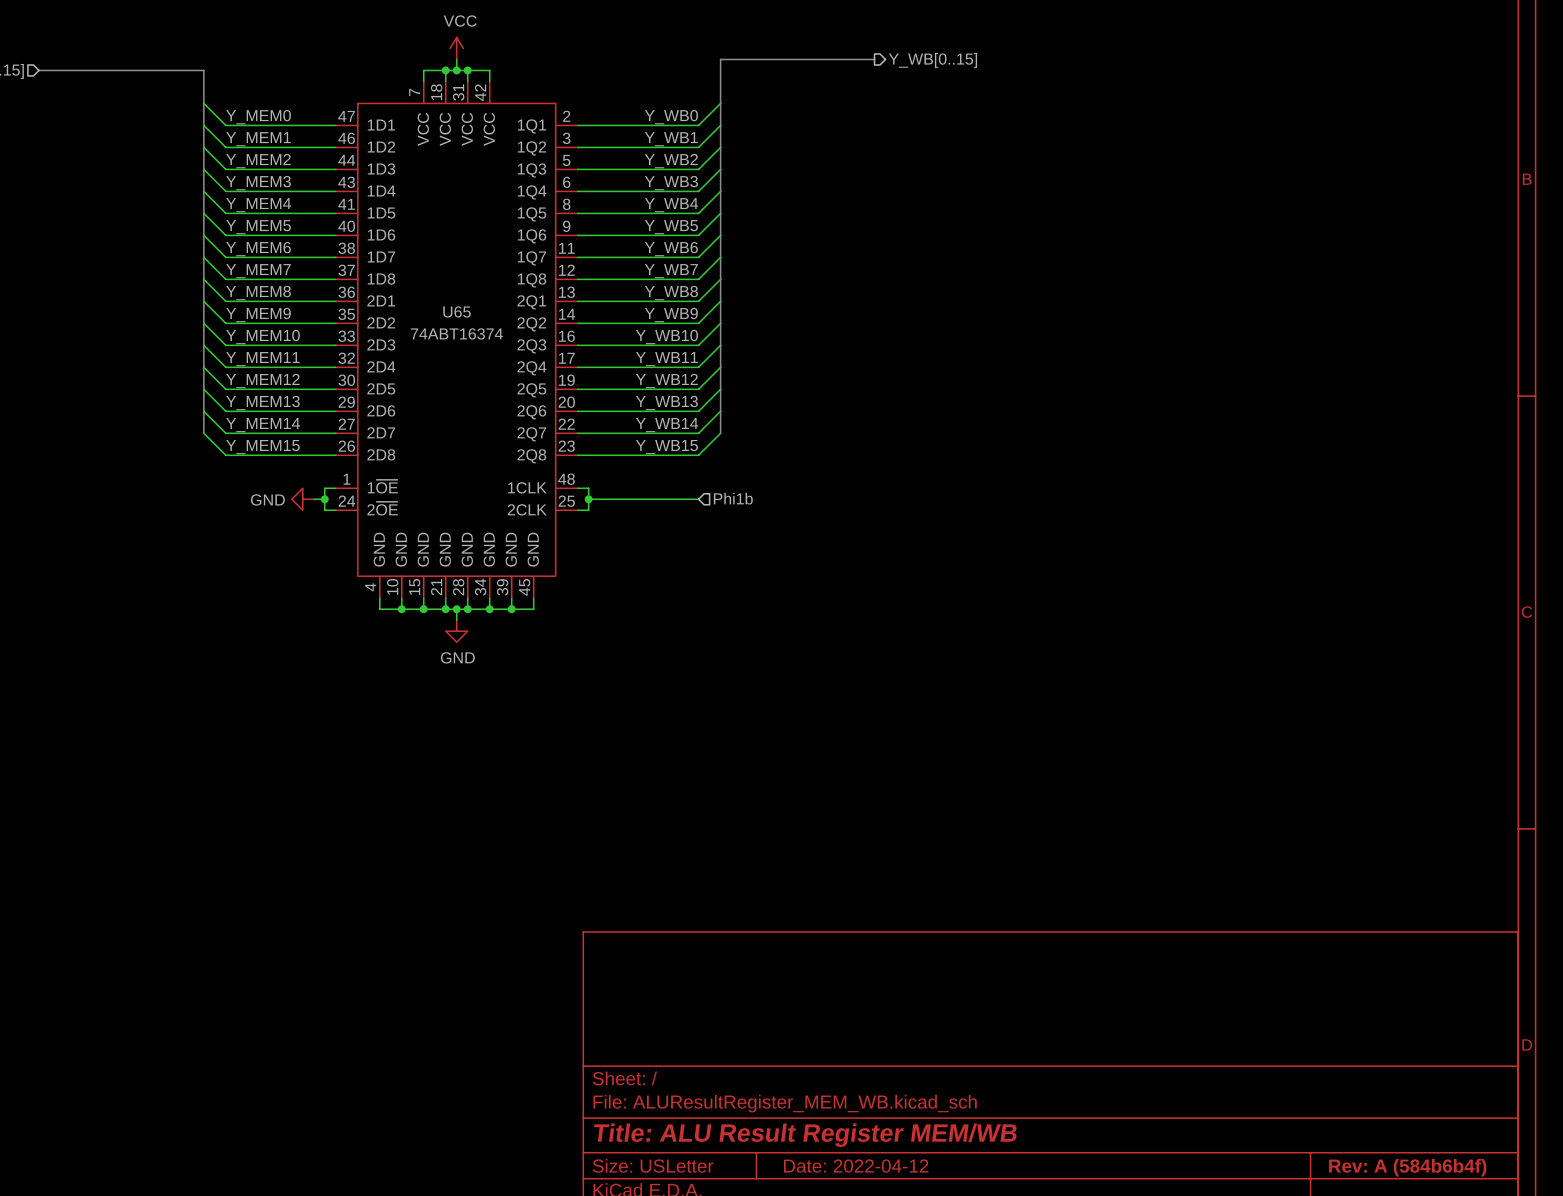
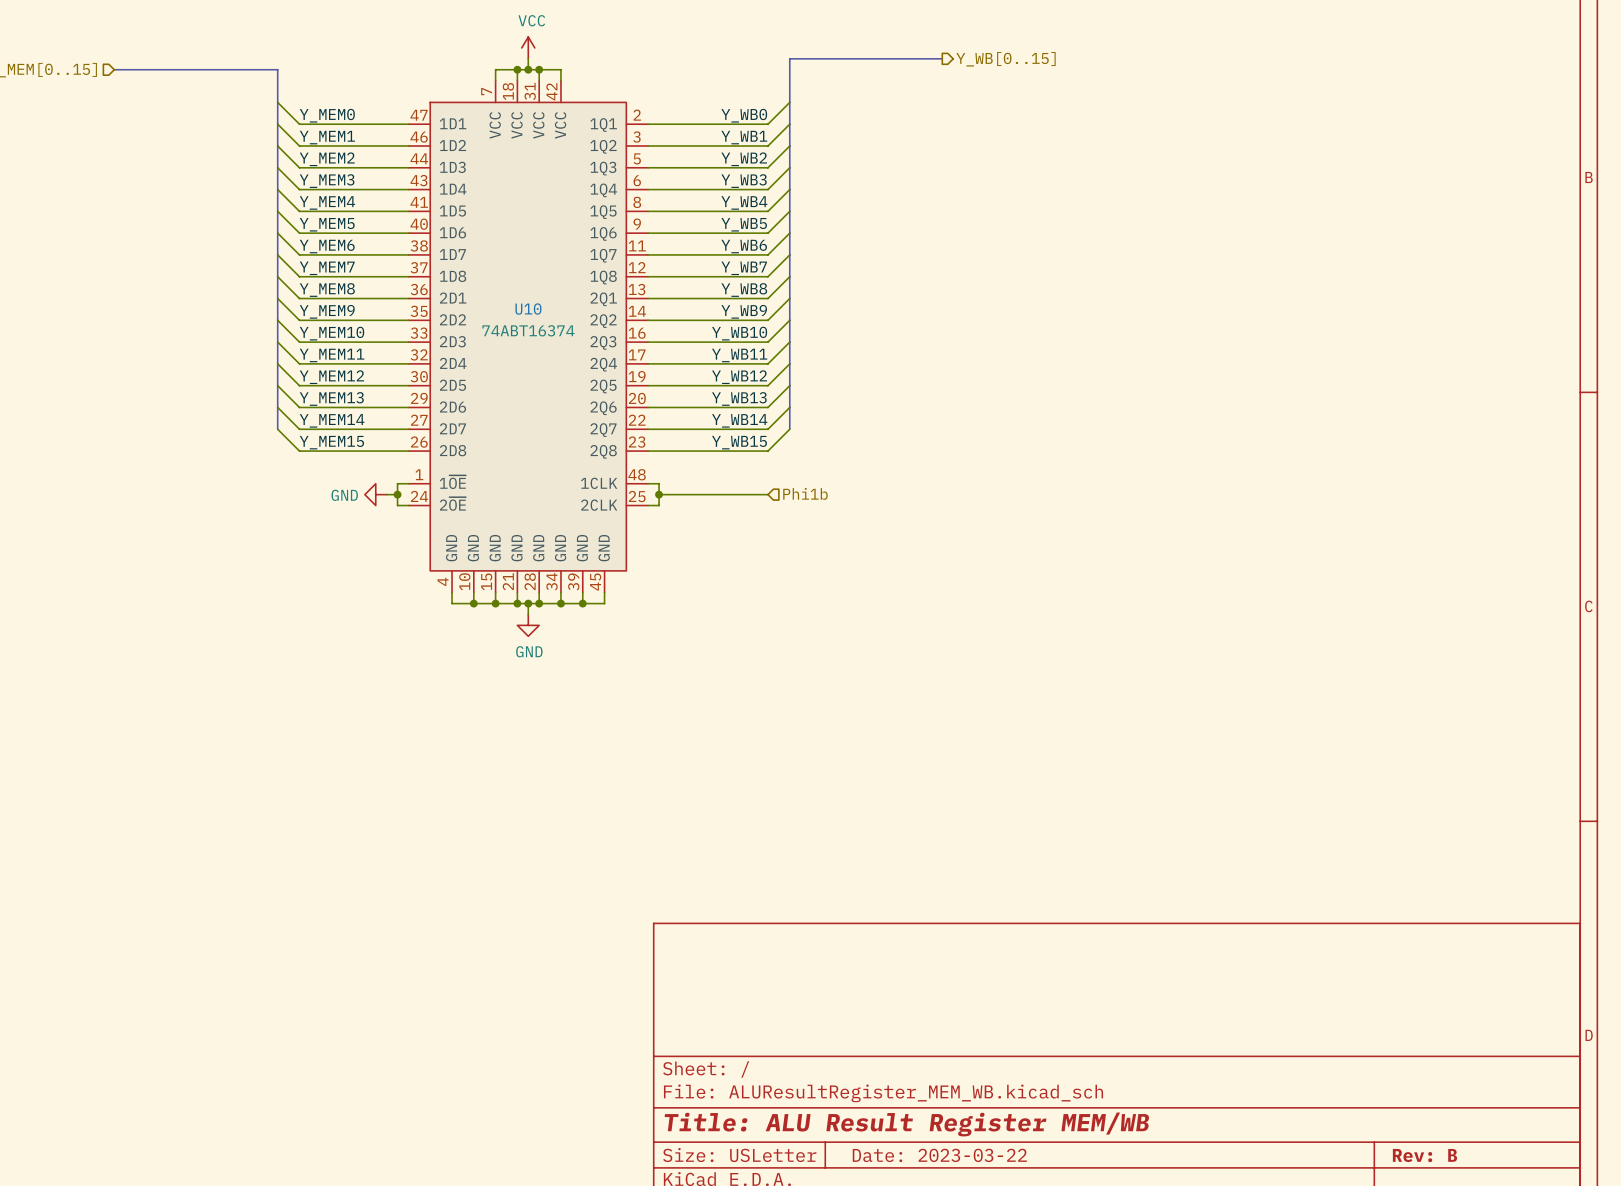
U65 name: U65 (457, 311) -> U10 (528, 309)
title block: Date: 2022-04-12 (856, 1166) -> Date: 2023-03-22 (939, 1155)
title block: Rev: A (584b6b4f) (1407, 1167) -> Rev: B (1424, 1155)

